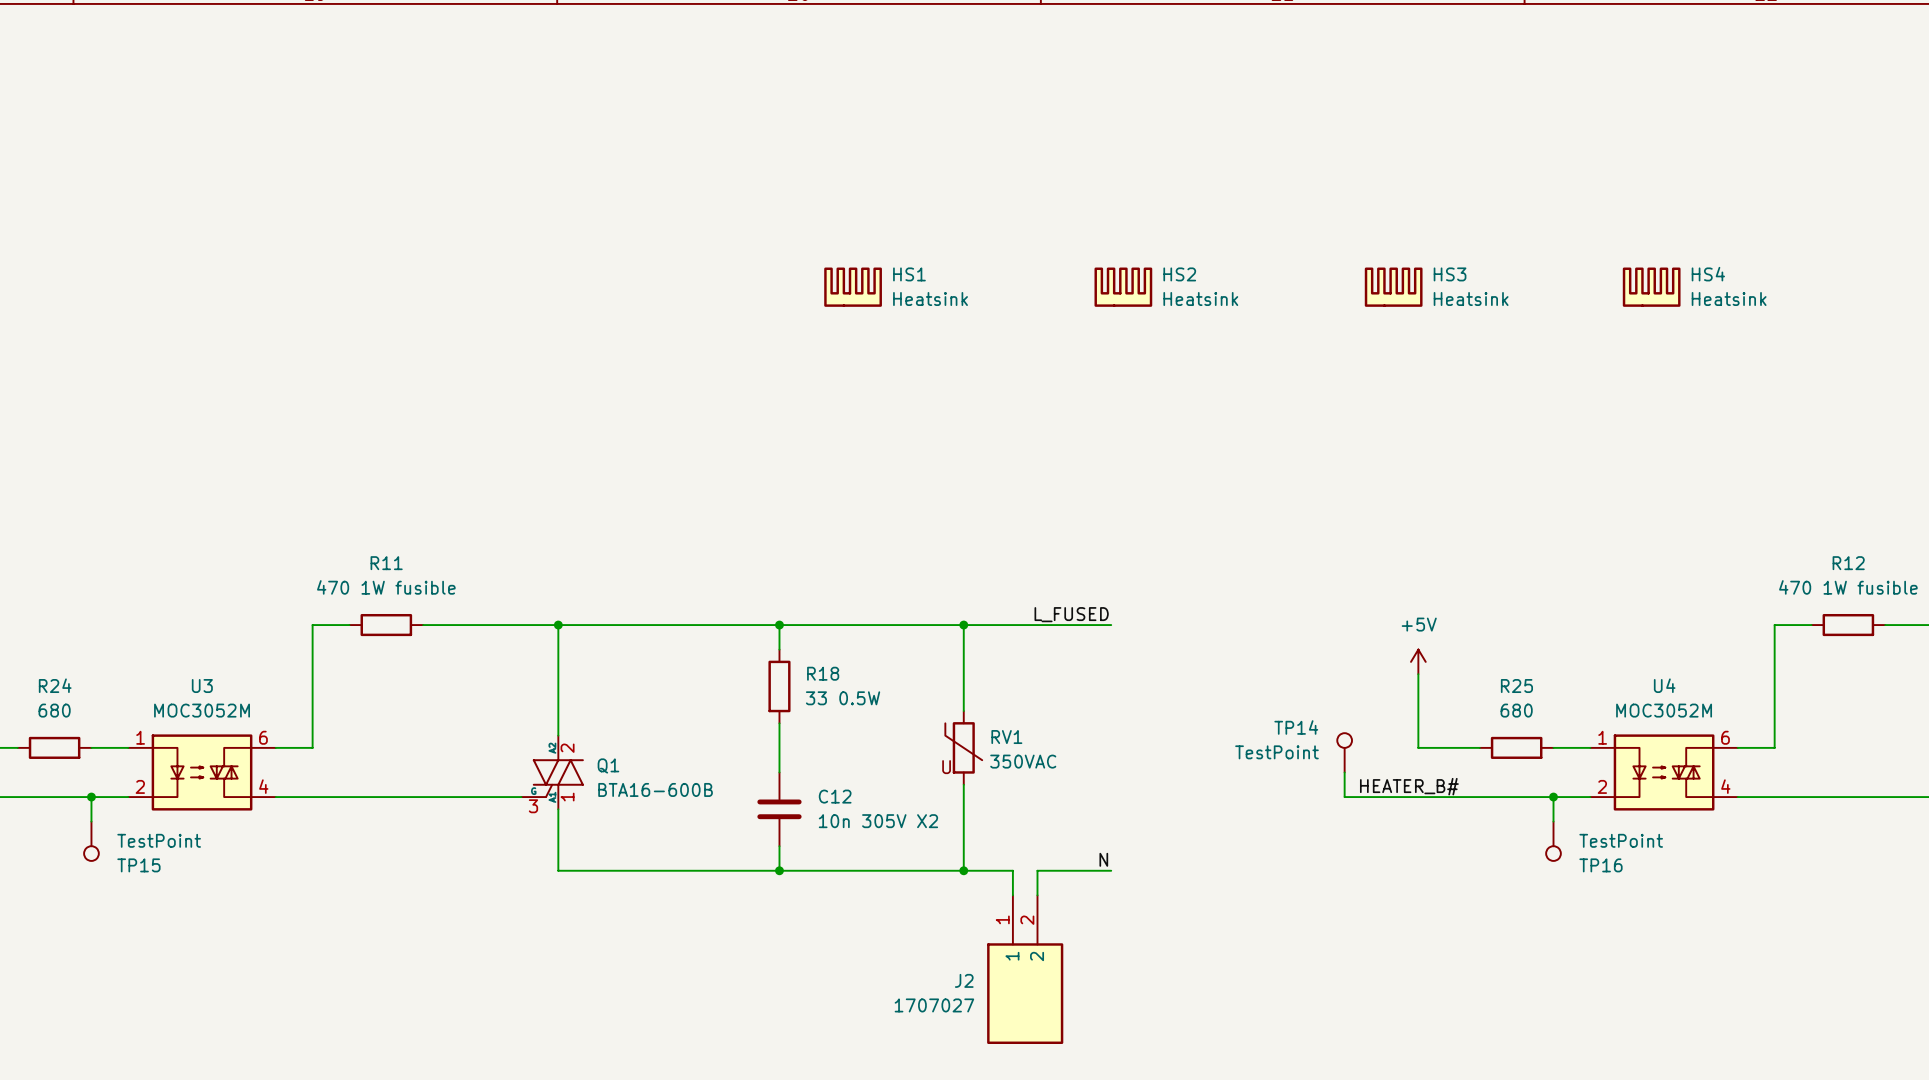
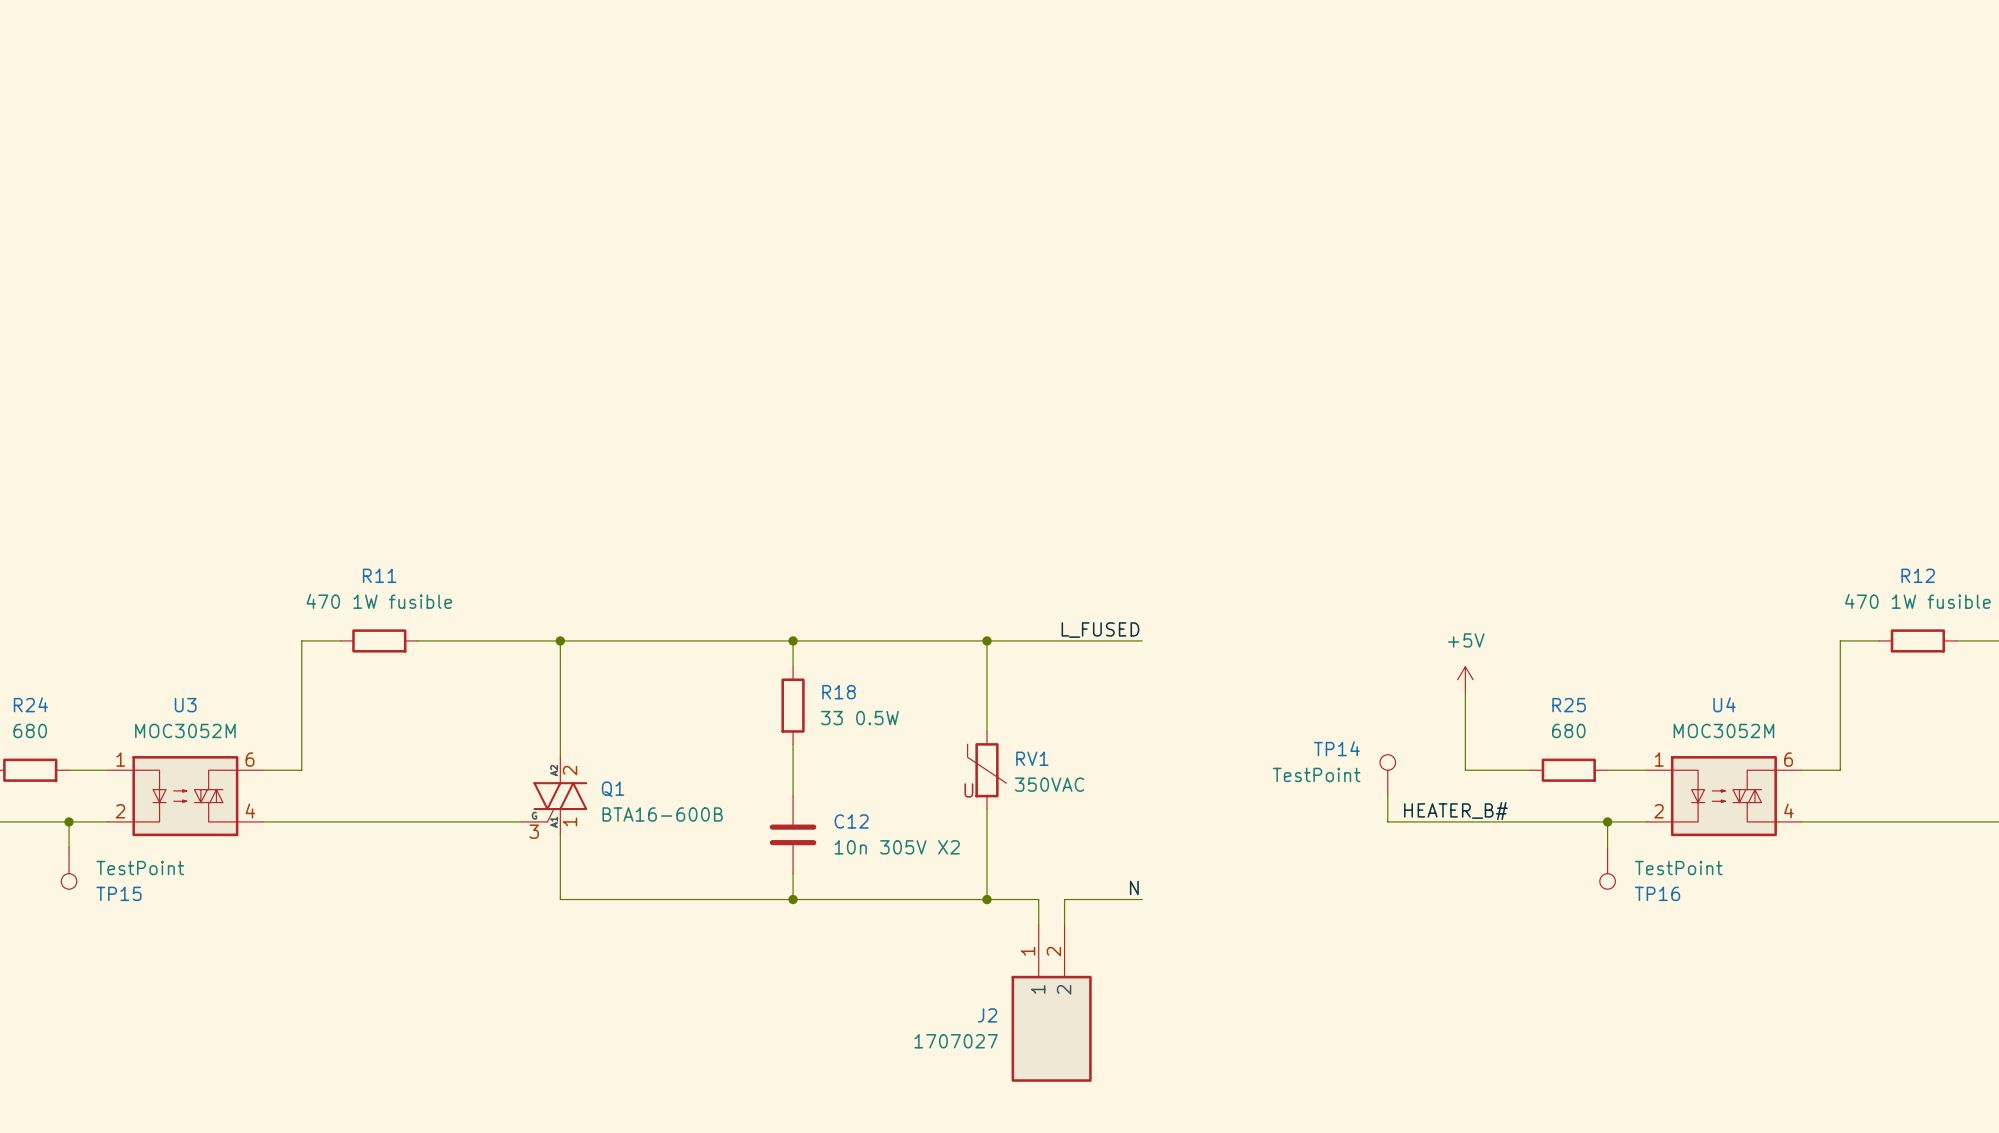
HS1: Heatsink (853, 287) -> none
HS2: Heatsink (1123, 287) -> none
HS3: Heatsink (1393, 287) -> none
HS4: Heatsink (1651, 287) -> none

